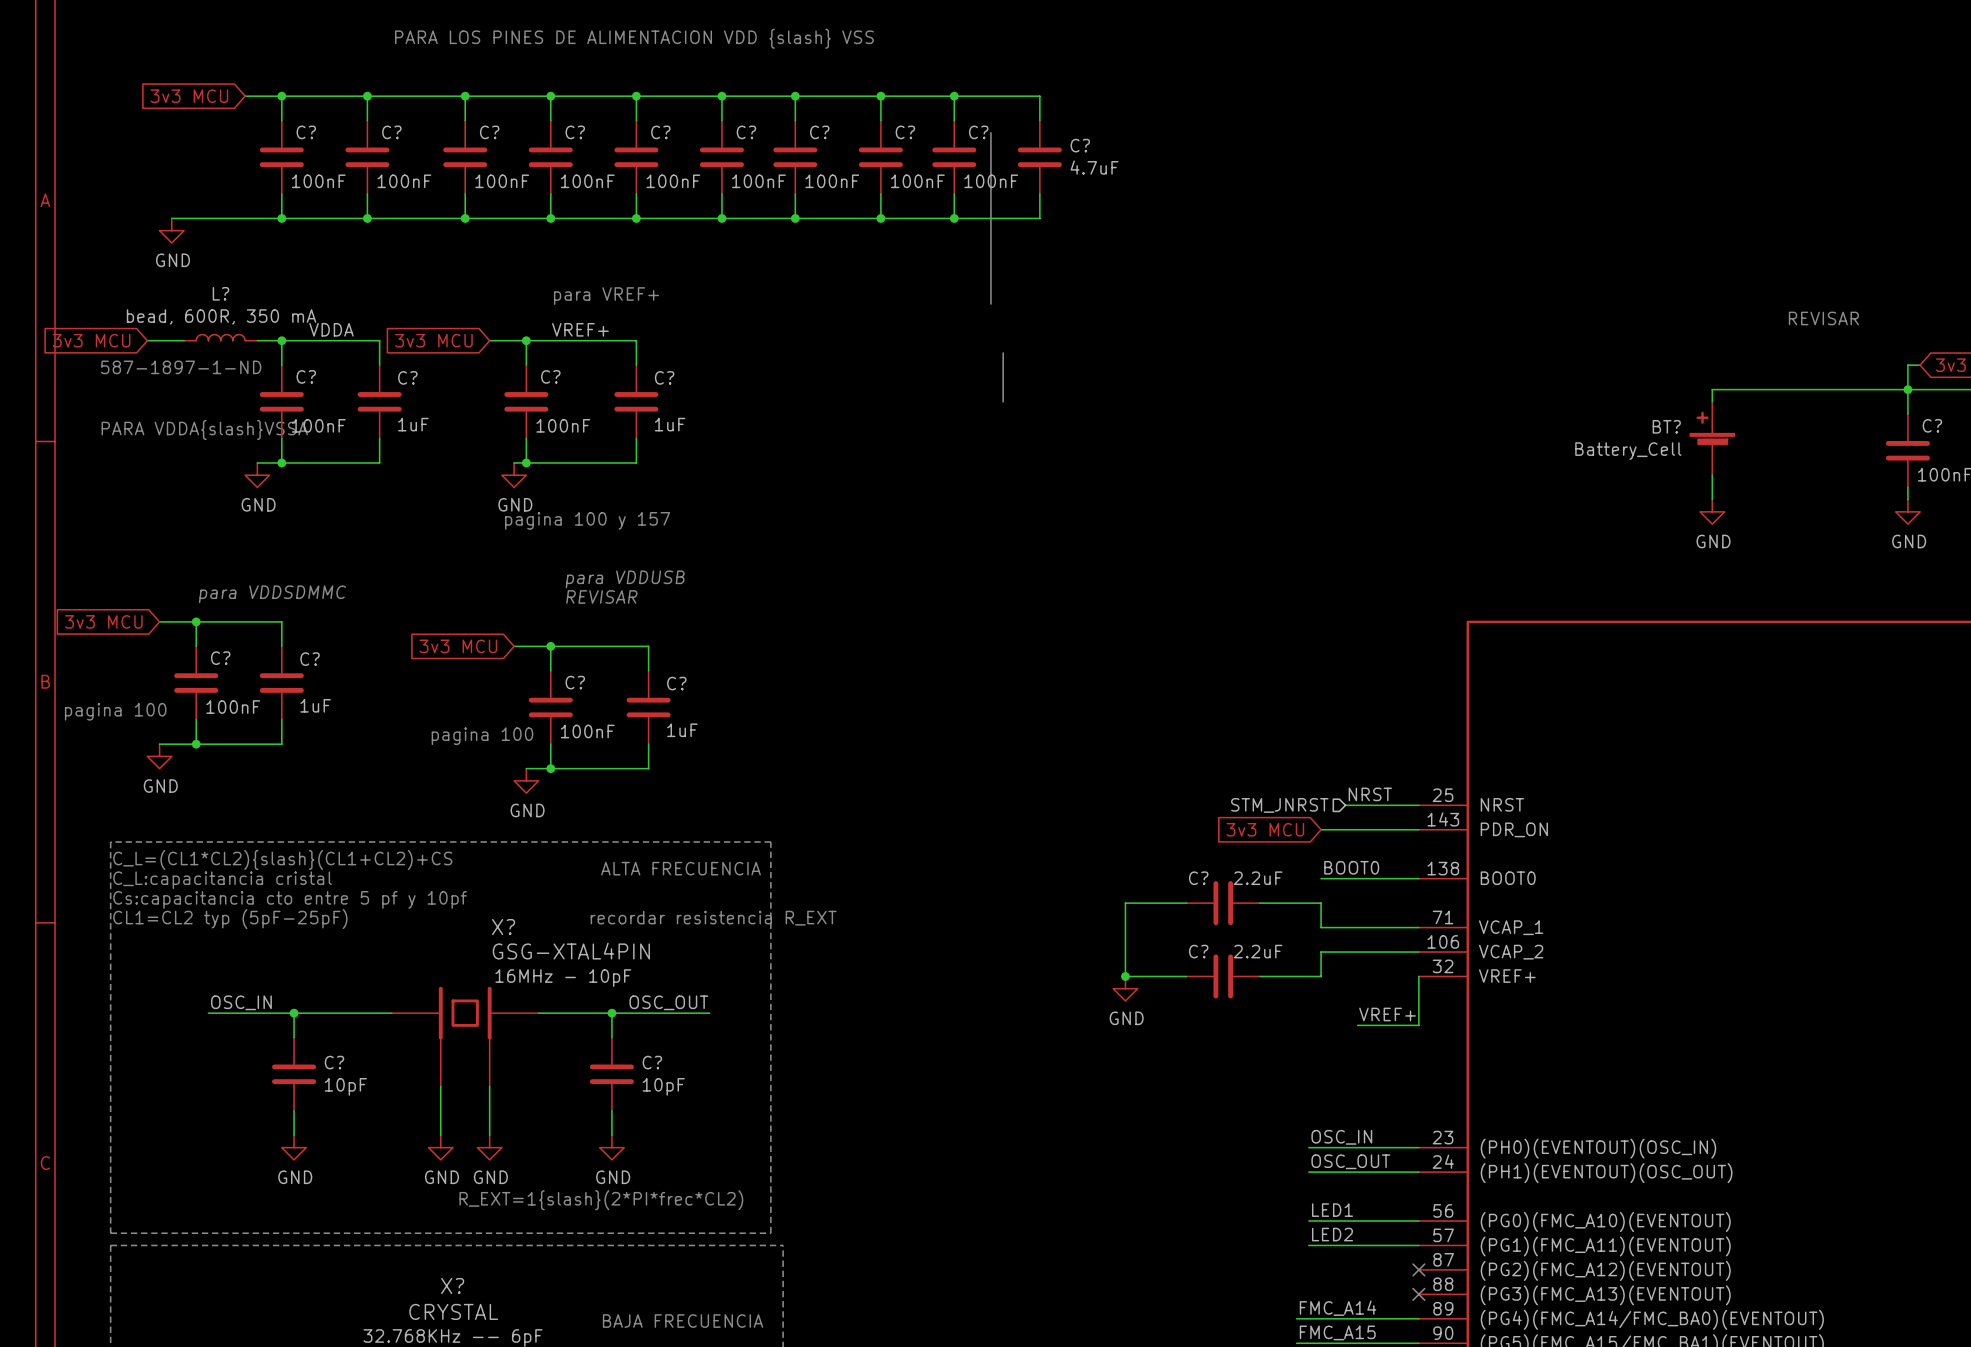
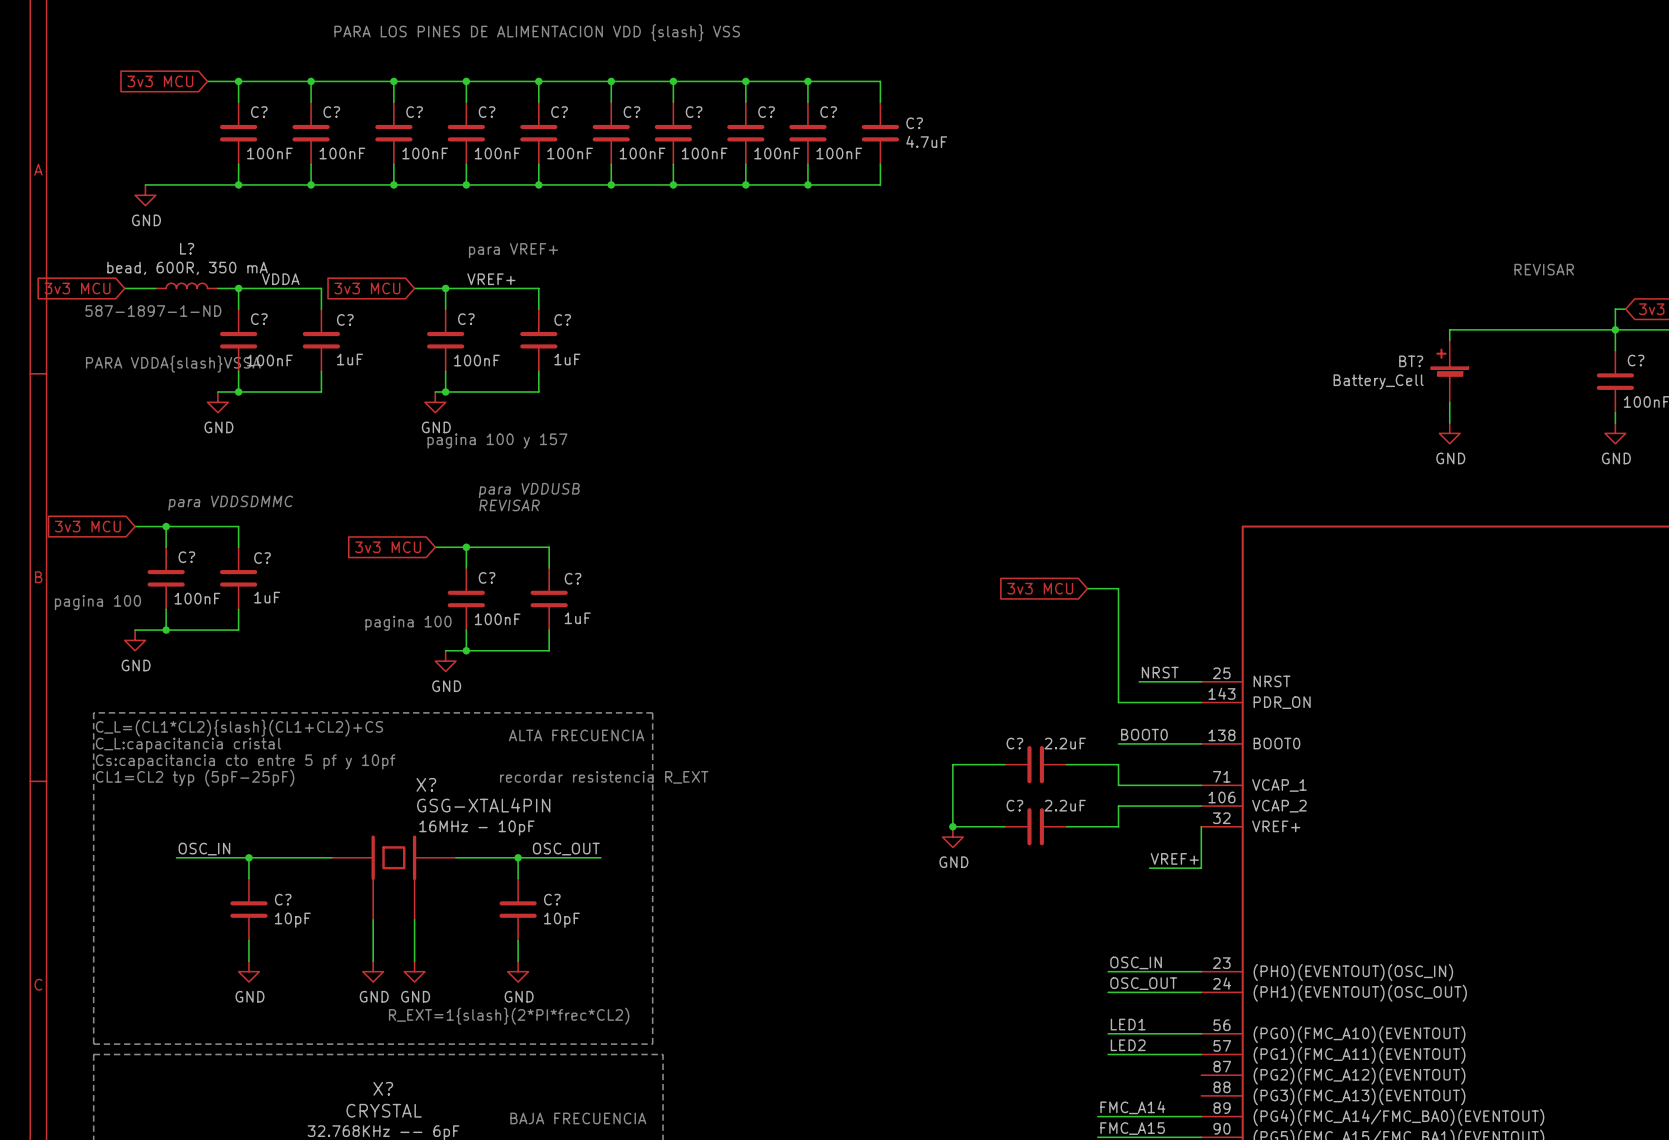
bus: (990, 132) (990, 304) -> none
bus: (1003, 352) (1003, 401) -> none
wire: none -> (1087, 588) (1118, 588) (1118, 702)
hierarchical label: STM_JNRST (1279, 805) -> none
global label position: 3v3 MCU (1265, 829) -> 3v3 MCU (1040, 588)
no-connect mark: (1418, 1269) -> none
no-connect mark: (1418, 1294) -> none

